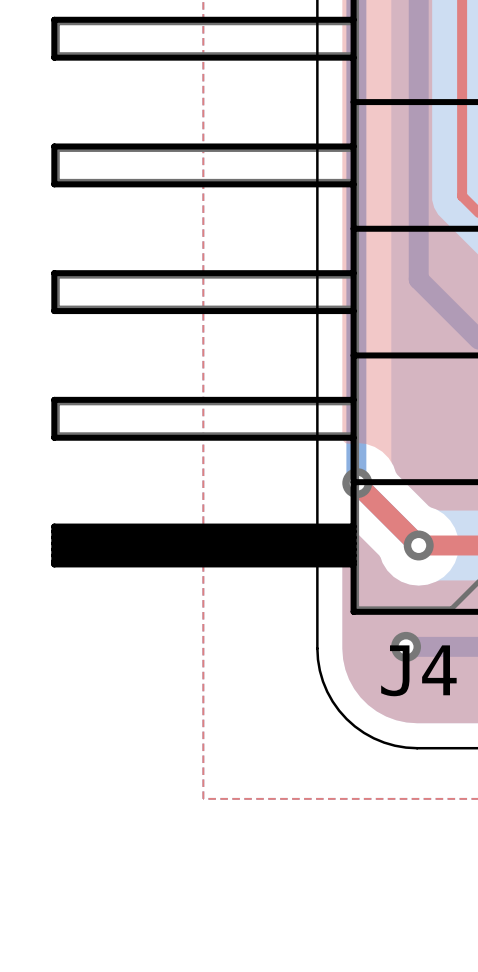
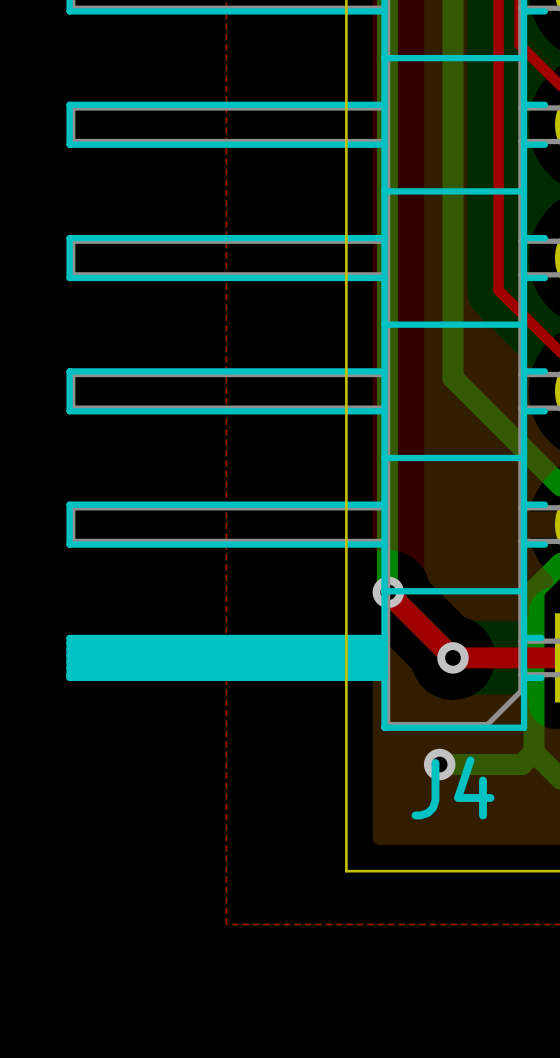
board edge: (317, 648) (322, 681) (332, 701) (346, 718) (373, 738) (394, 745) (417, 748) -> (346, 766) (346, 871) (451, 871)

